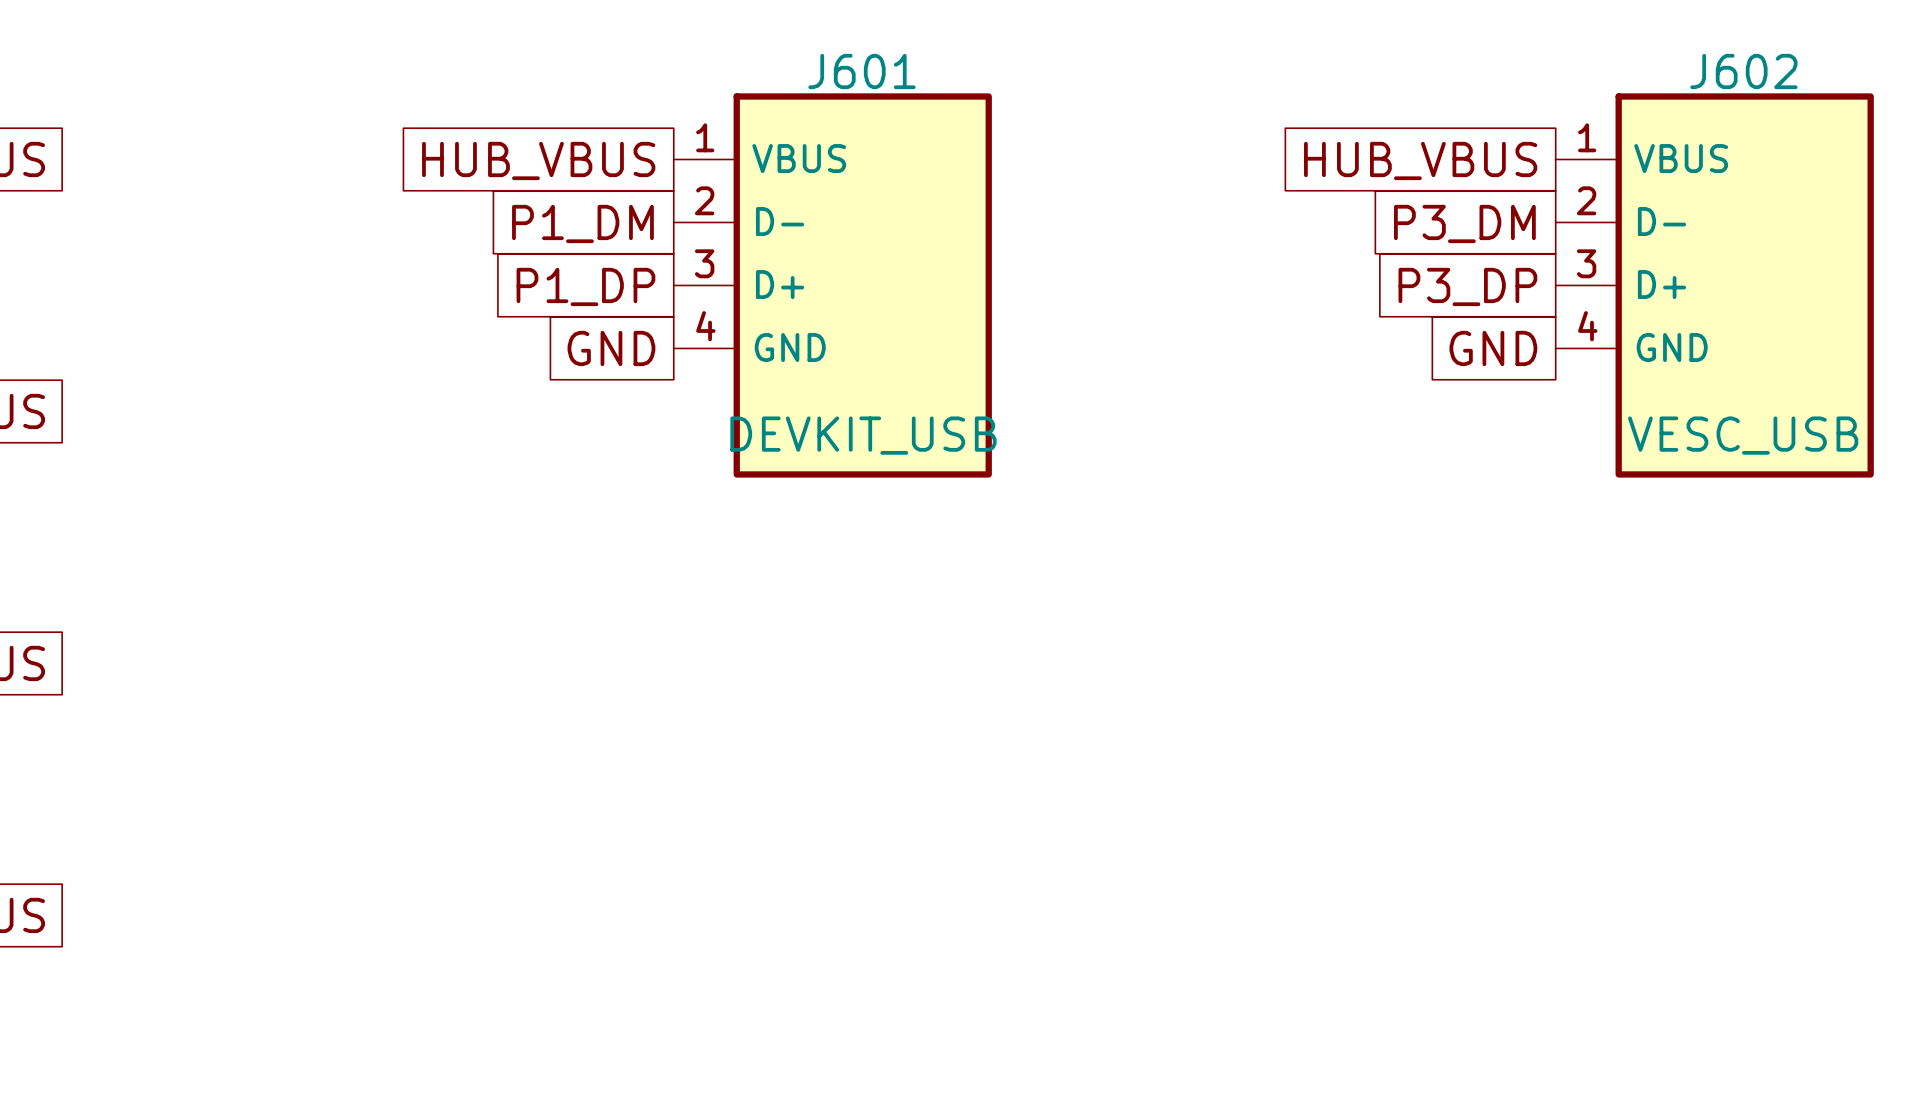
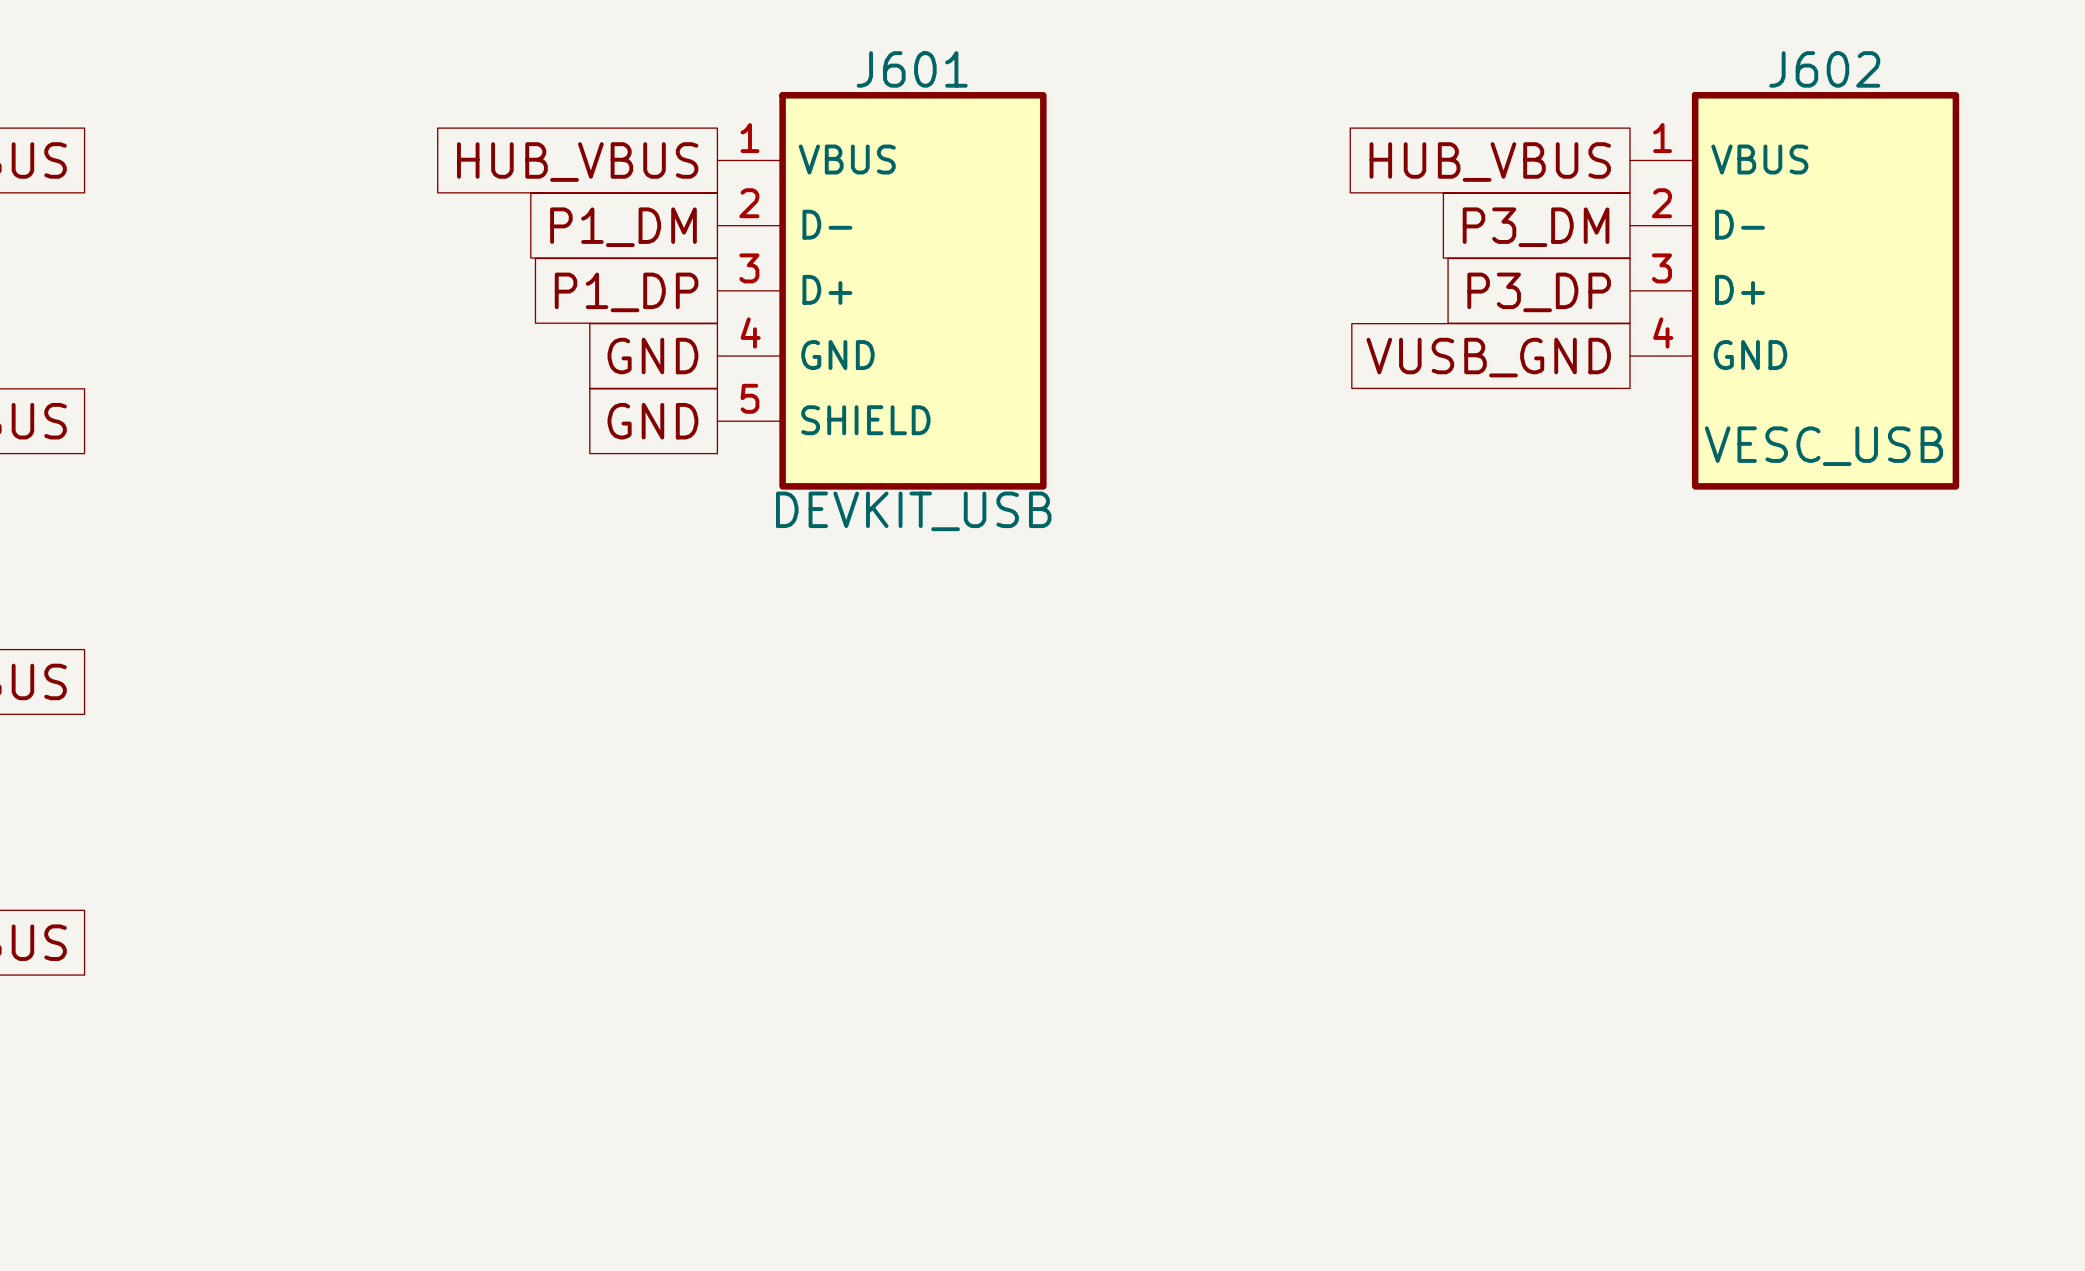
J601 symbol: [673, 93, 992, 478] -> [717, 92, 1047, 490]
global label: GND (1493, 348) -> VUSB_GND (1488, 357)
global label: none -> GND (652, 421)
J601 value position: DEVKIT_USB (863, 435) -> DEVKIT_USB (913, 511)

